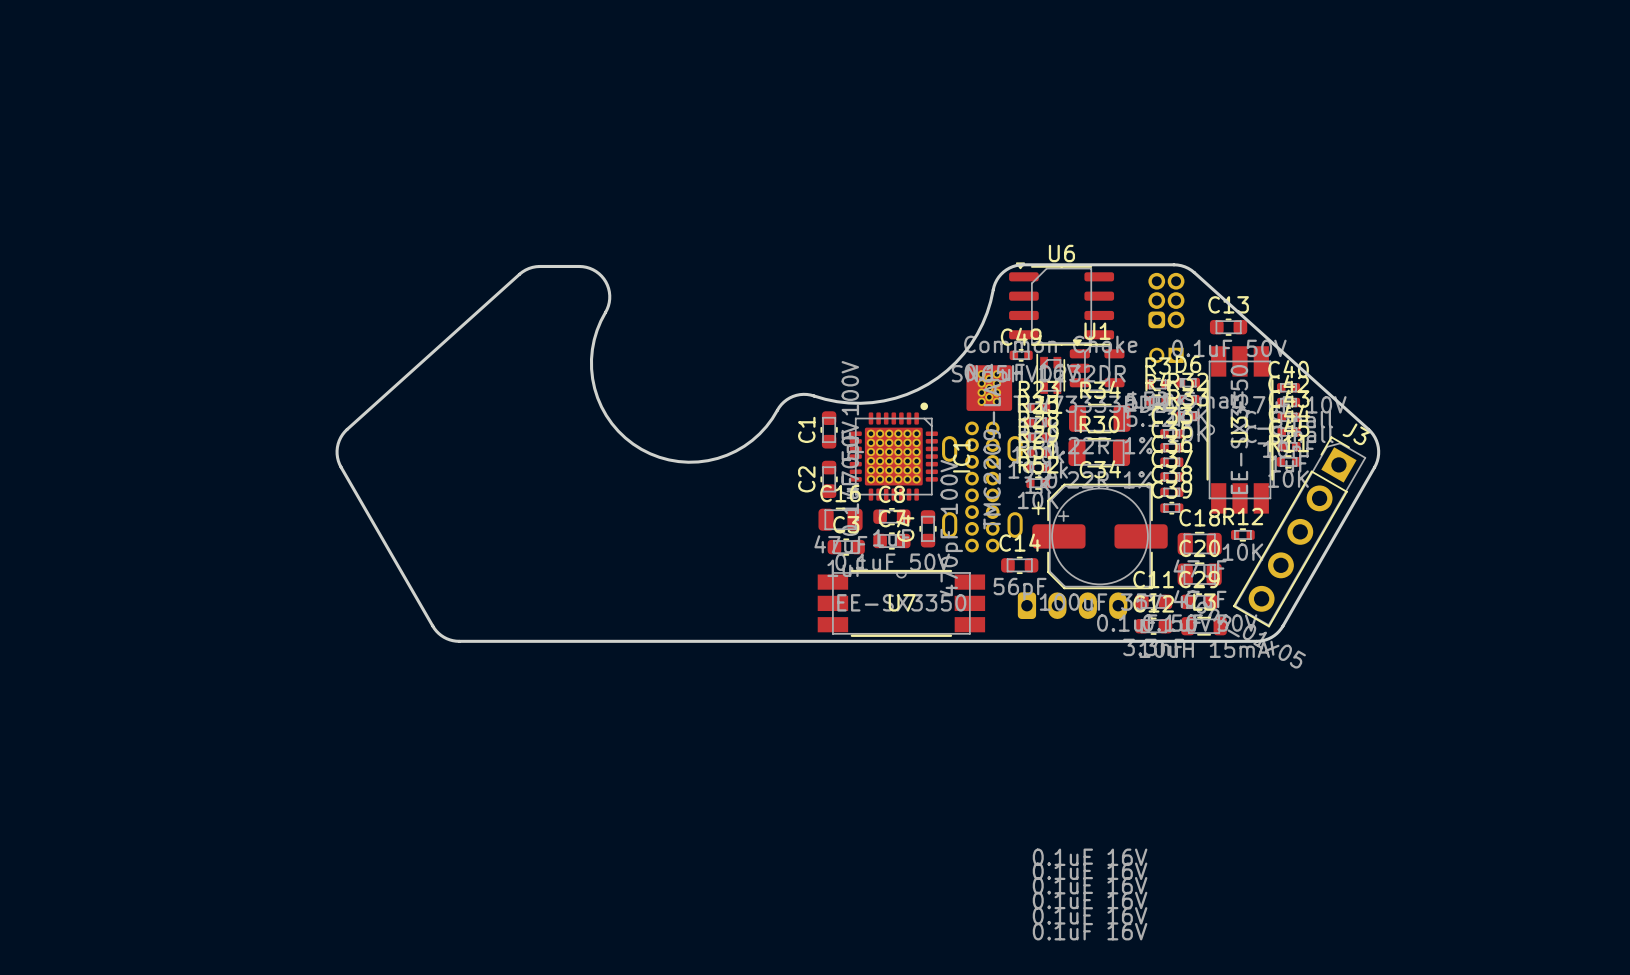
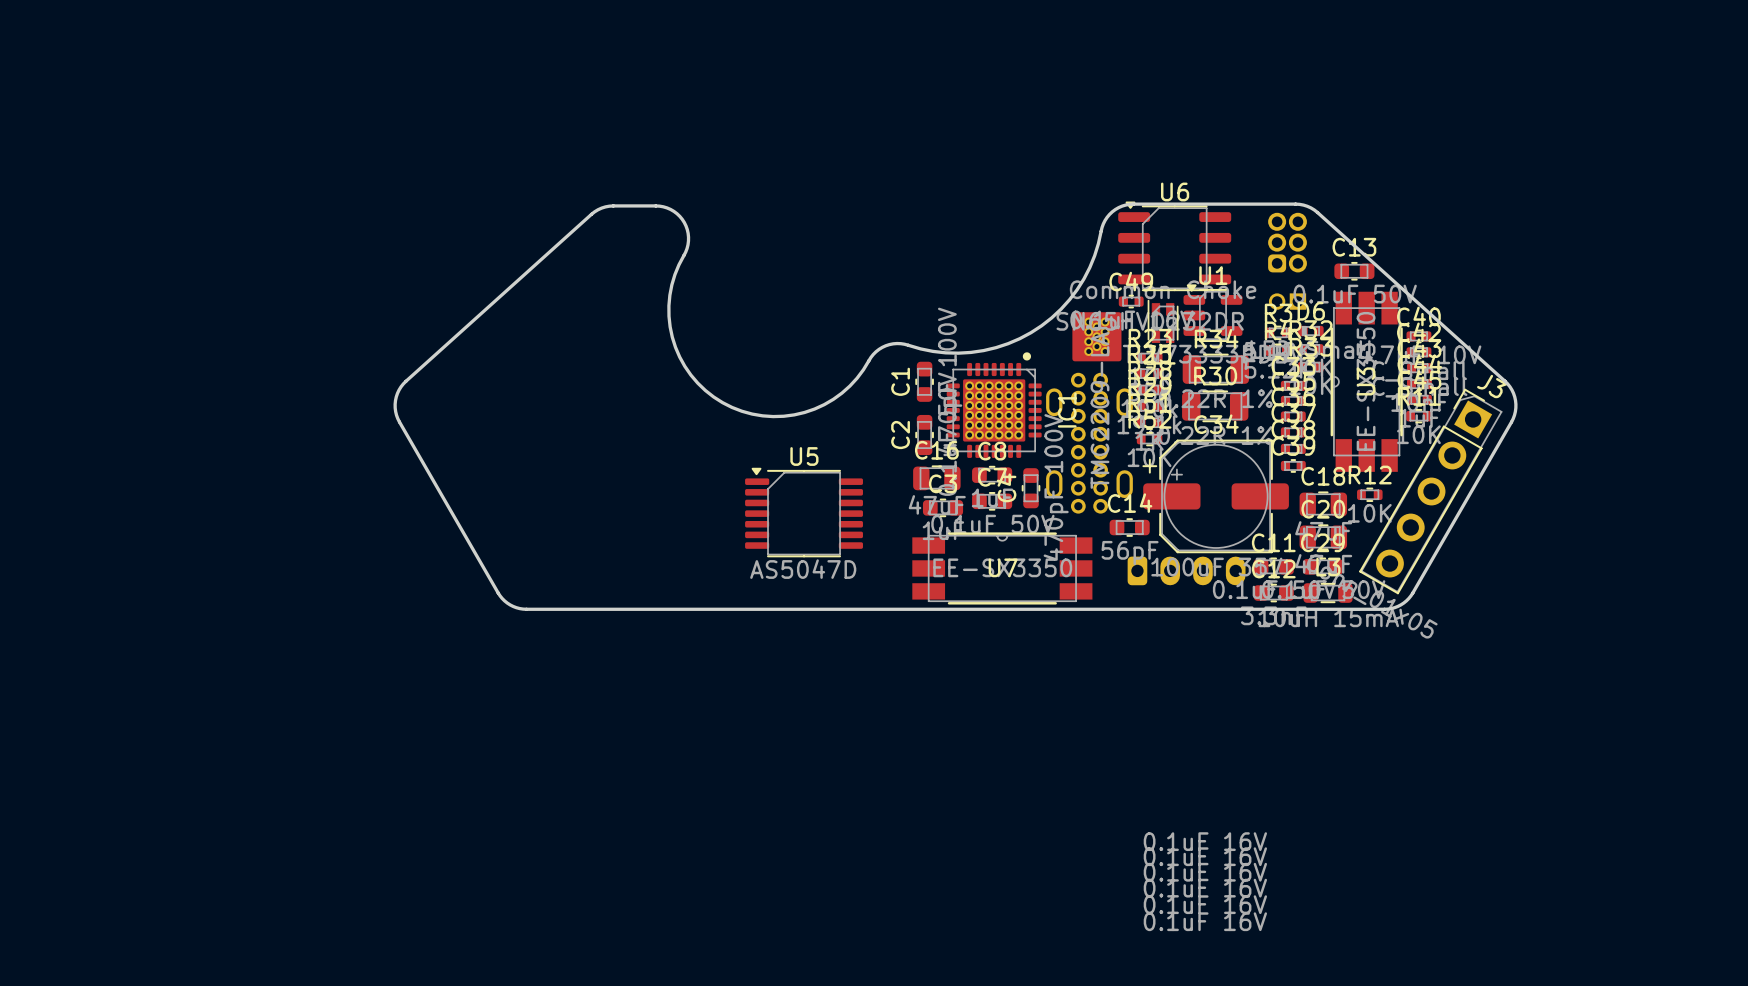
U5: none -> AS5047D (804, 512)

